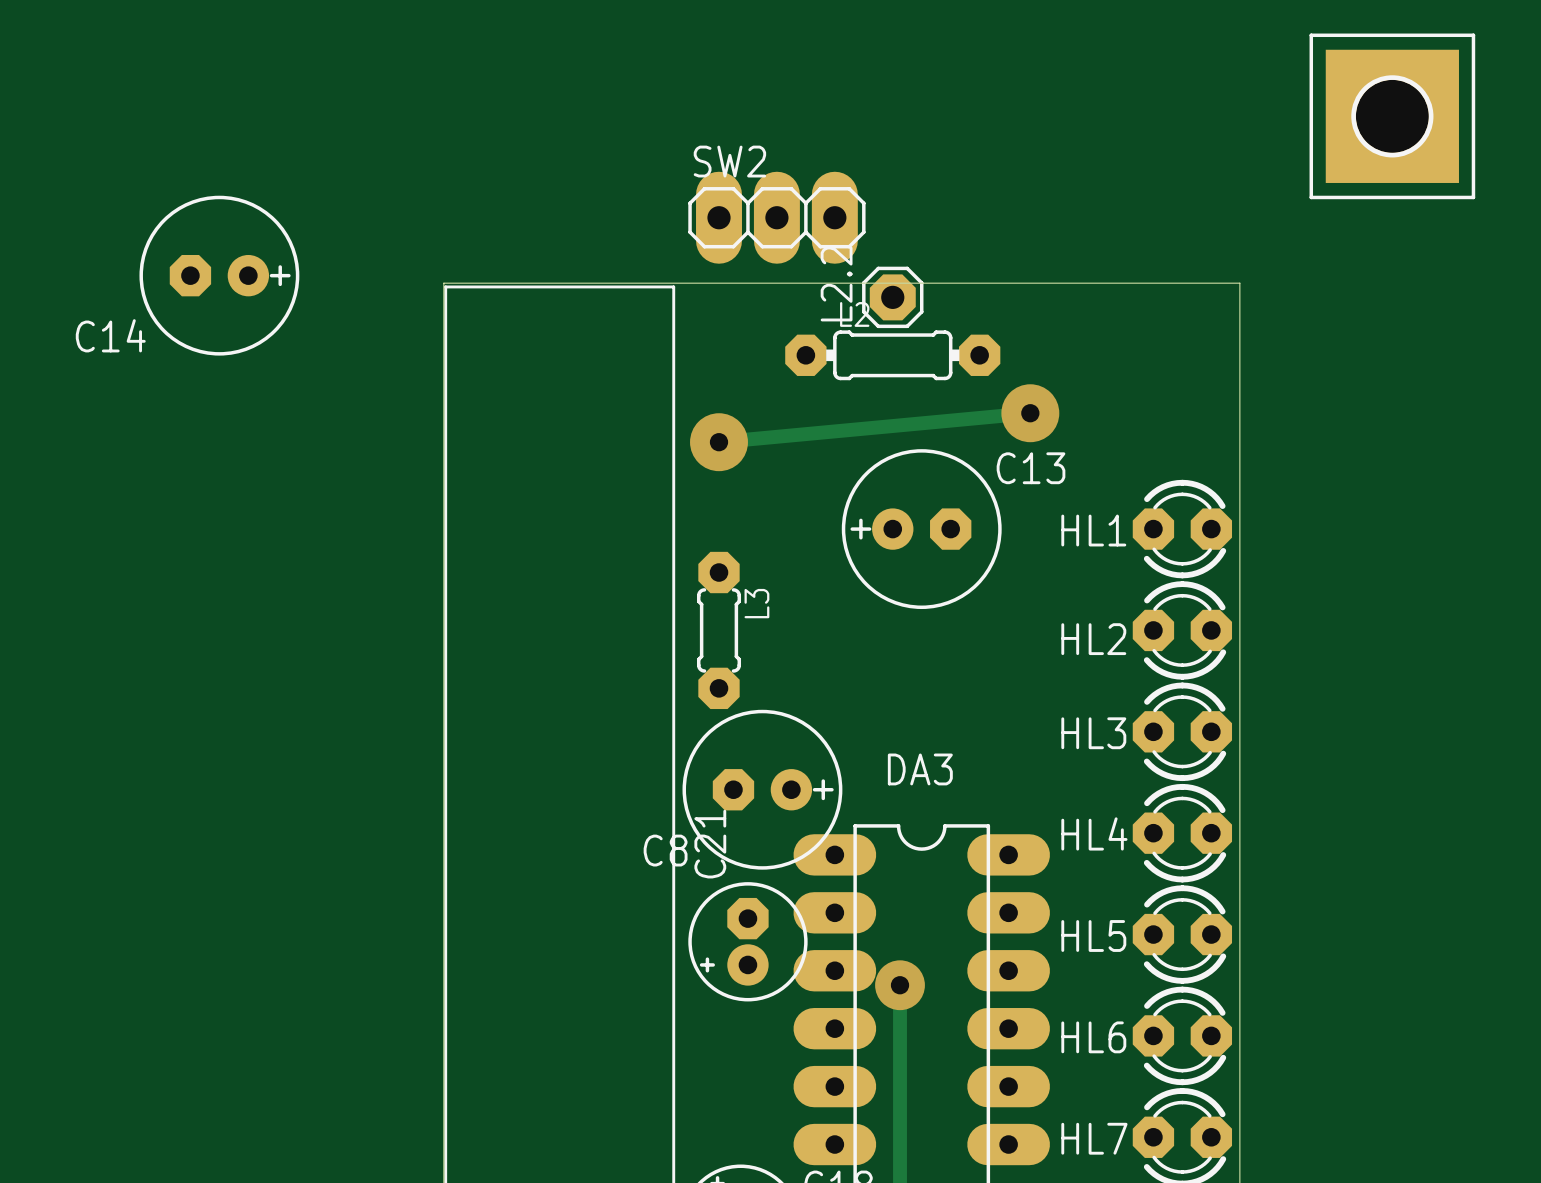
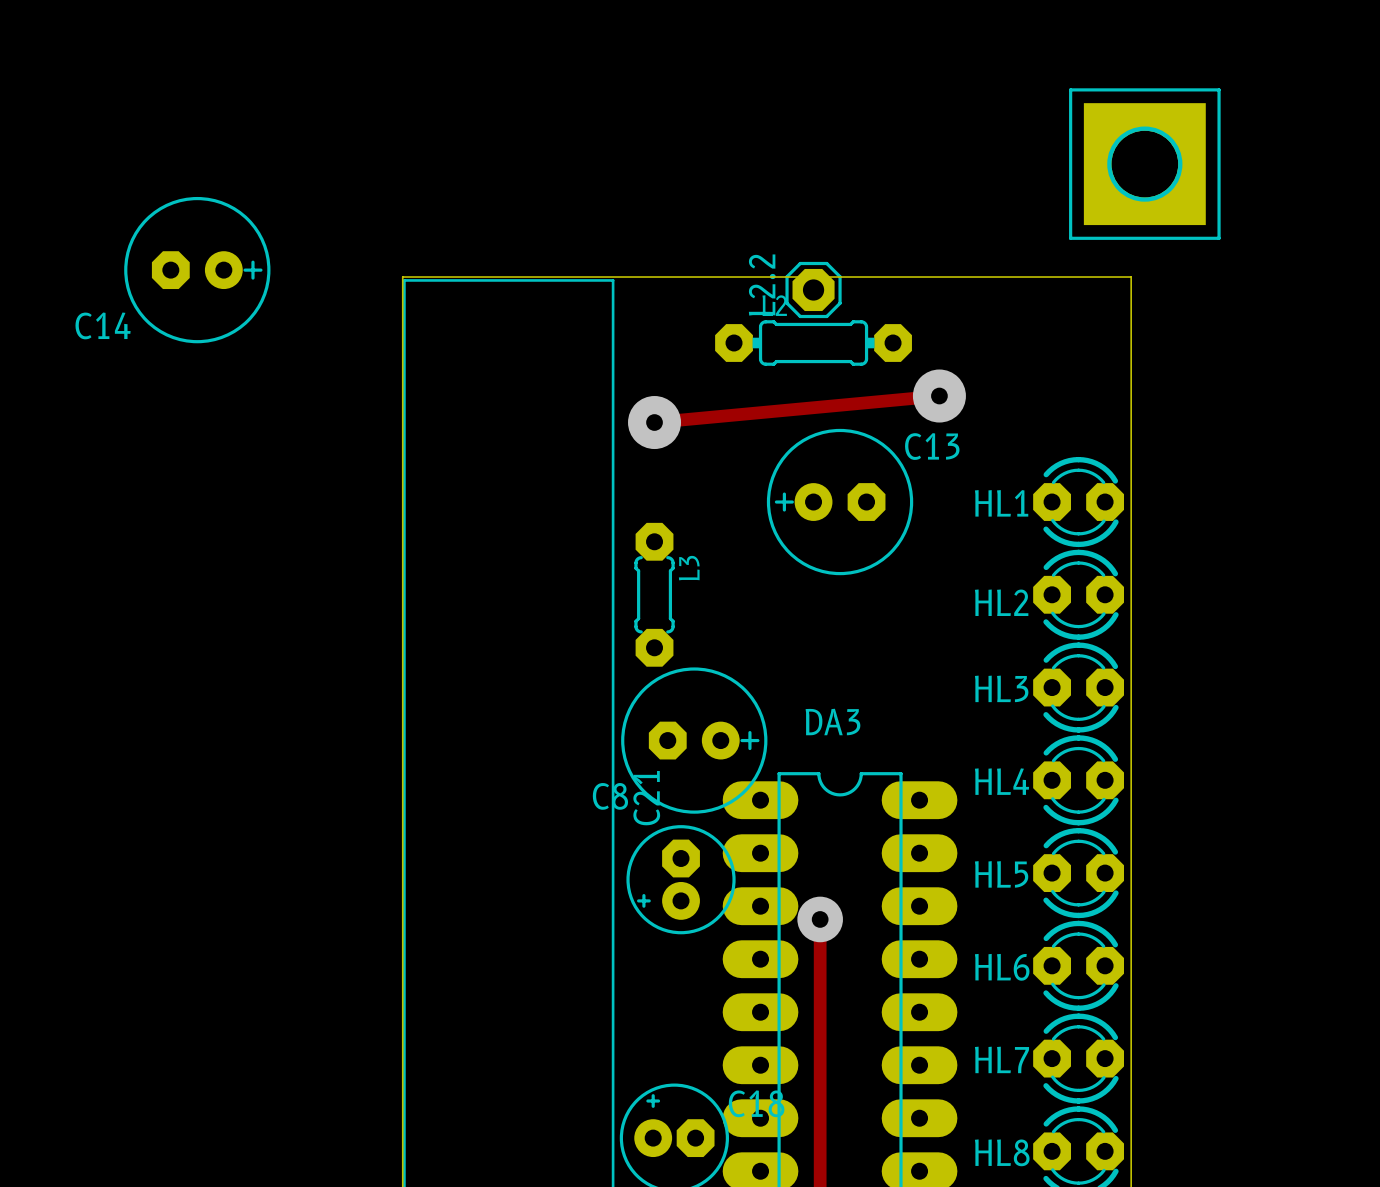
part position: (1392, 116) -> (1144, 164)
SW2: (776, 217) -> none

